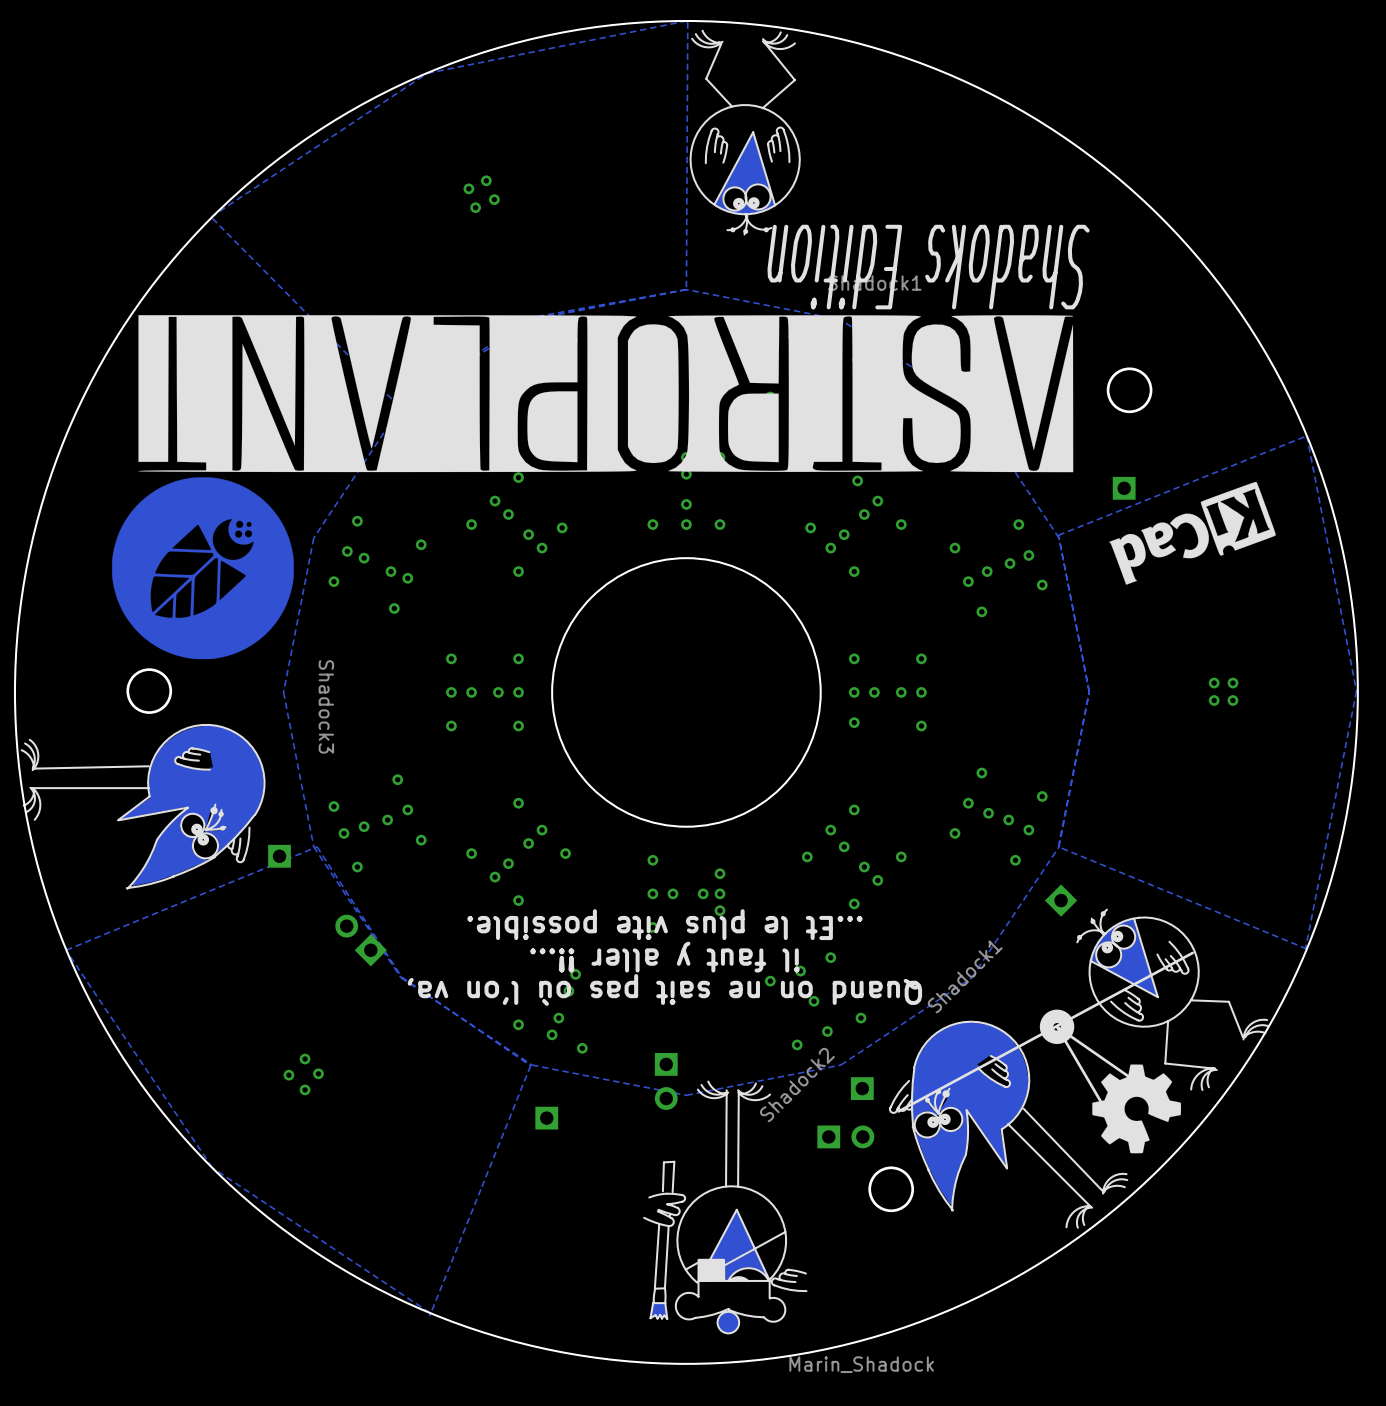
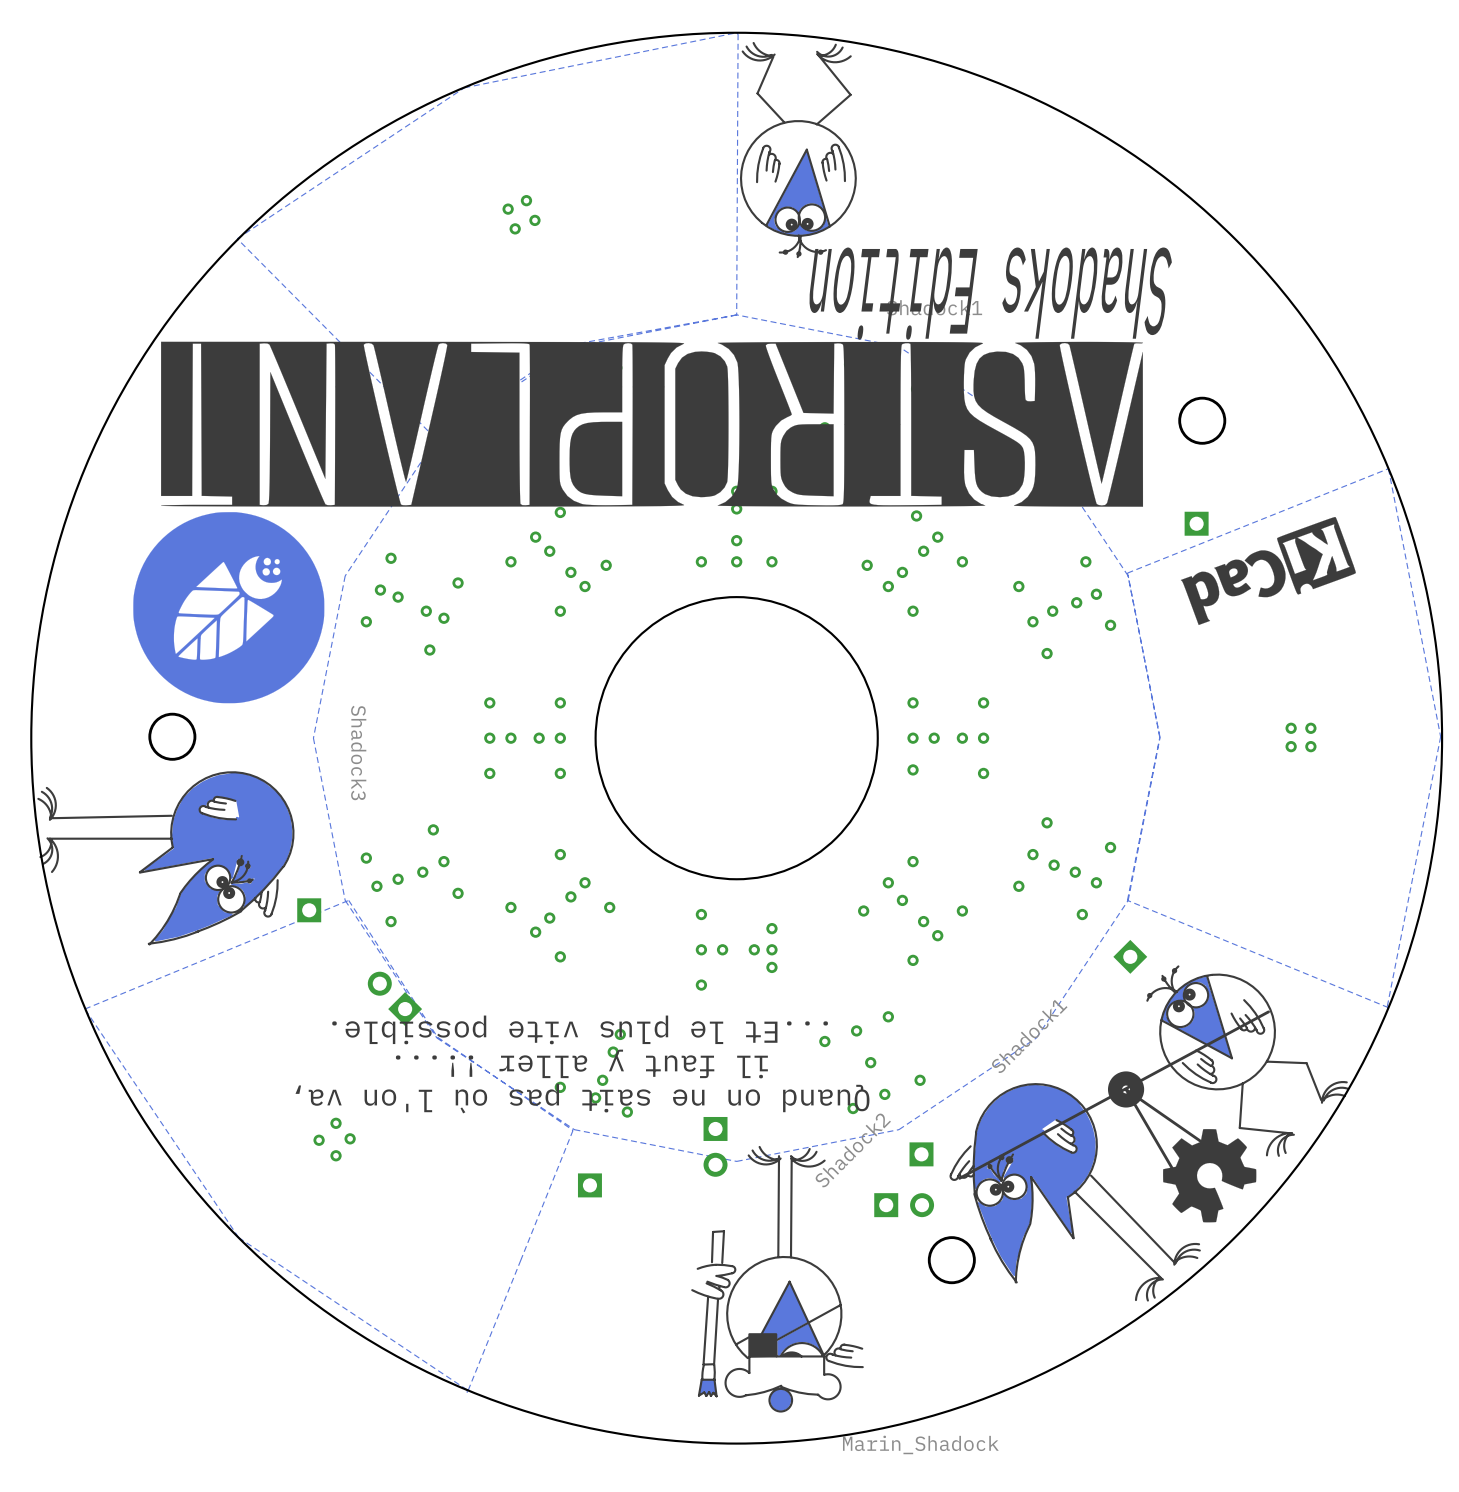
text position: ...Et le plus vite possible. (664, 924) -> ...Et le plus vite possible. (580, 1029)
text position: il faut y aller !!... (664, 957) -> il faut y aller !!... (581, 1064)
text position: Quand on ne sait pas où l'on va, (664, 989) -> Quand on ne sait pas où l'on va, (582, 1098)

